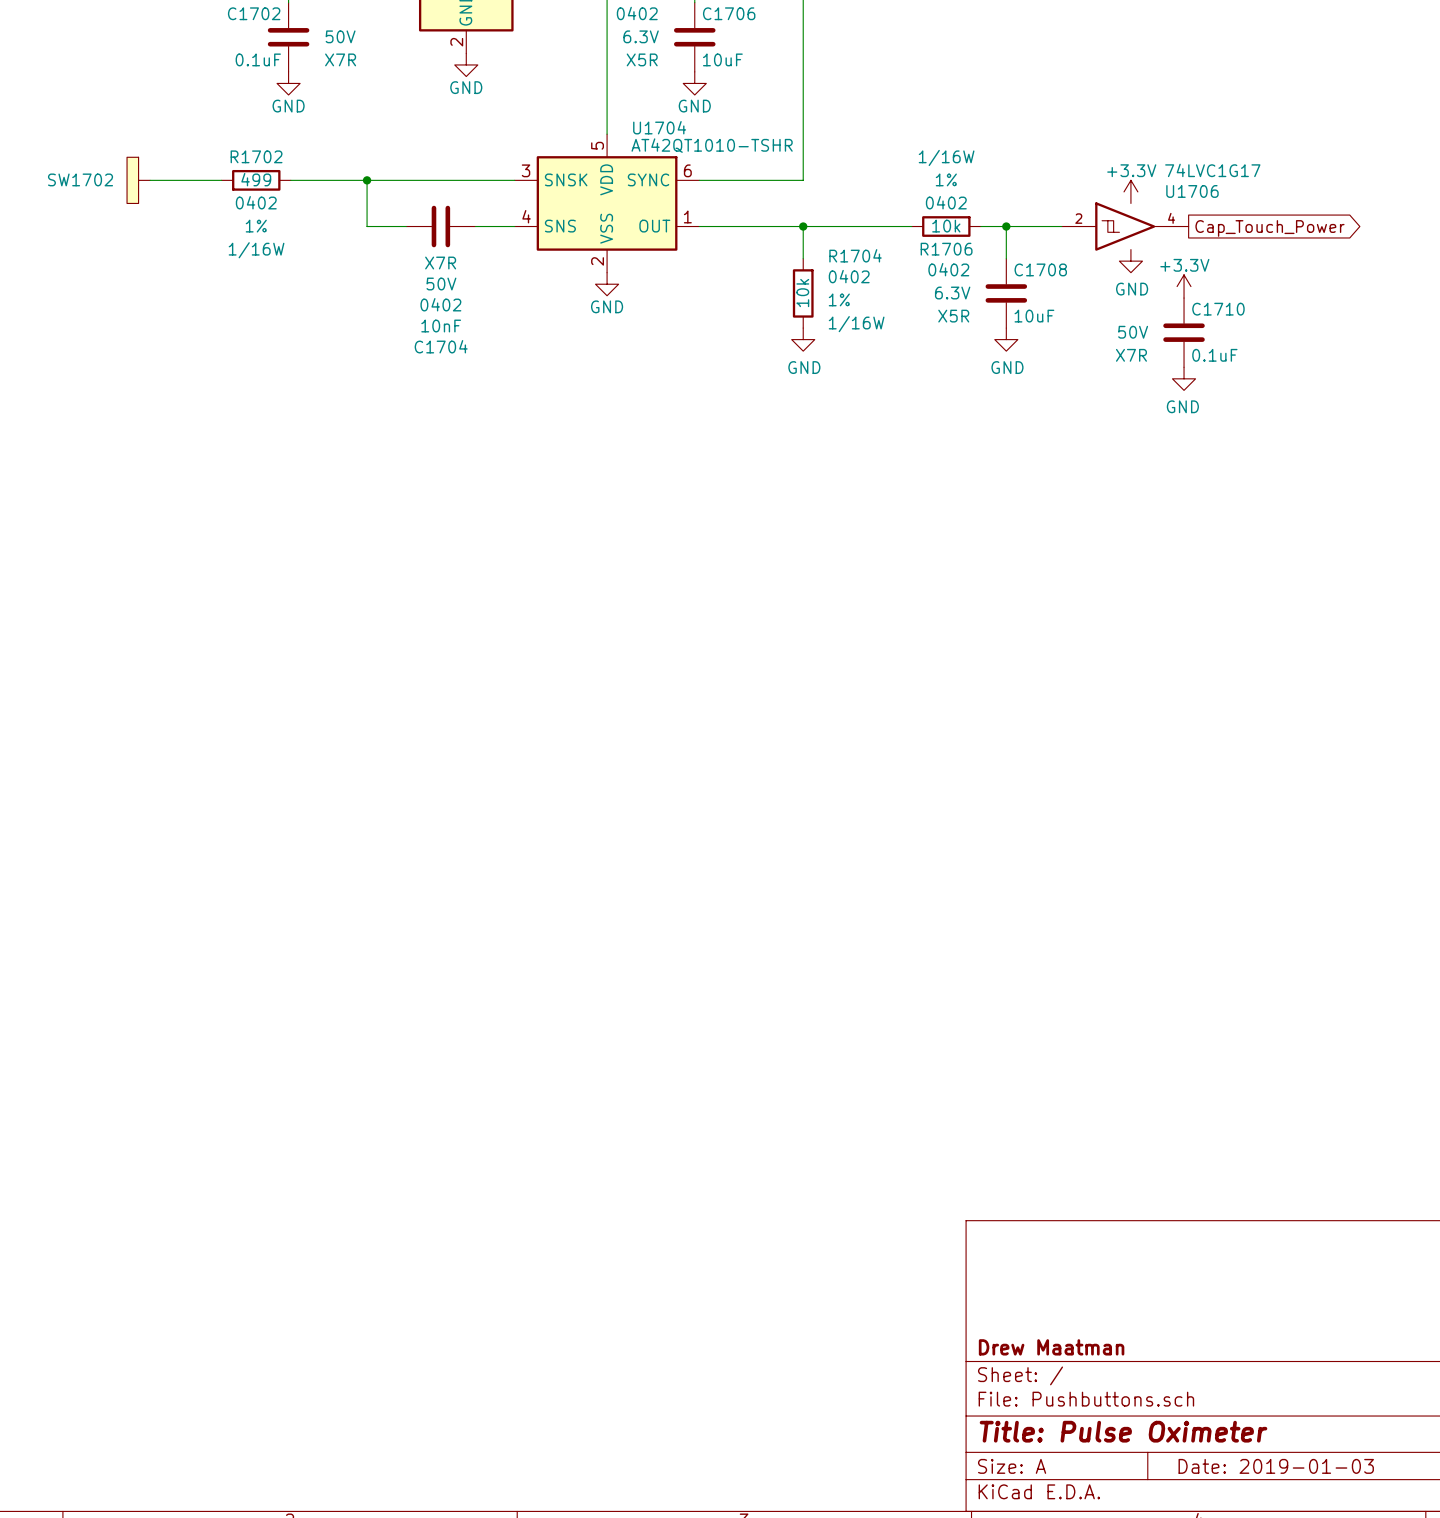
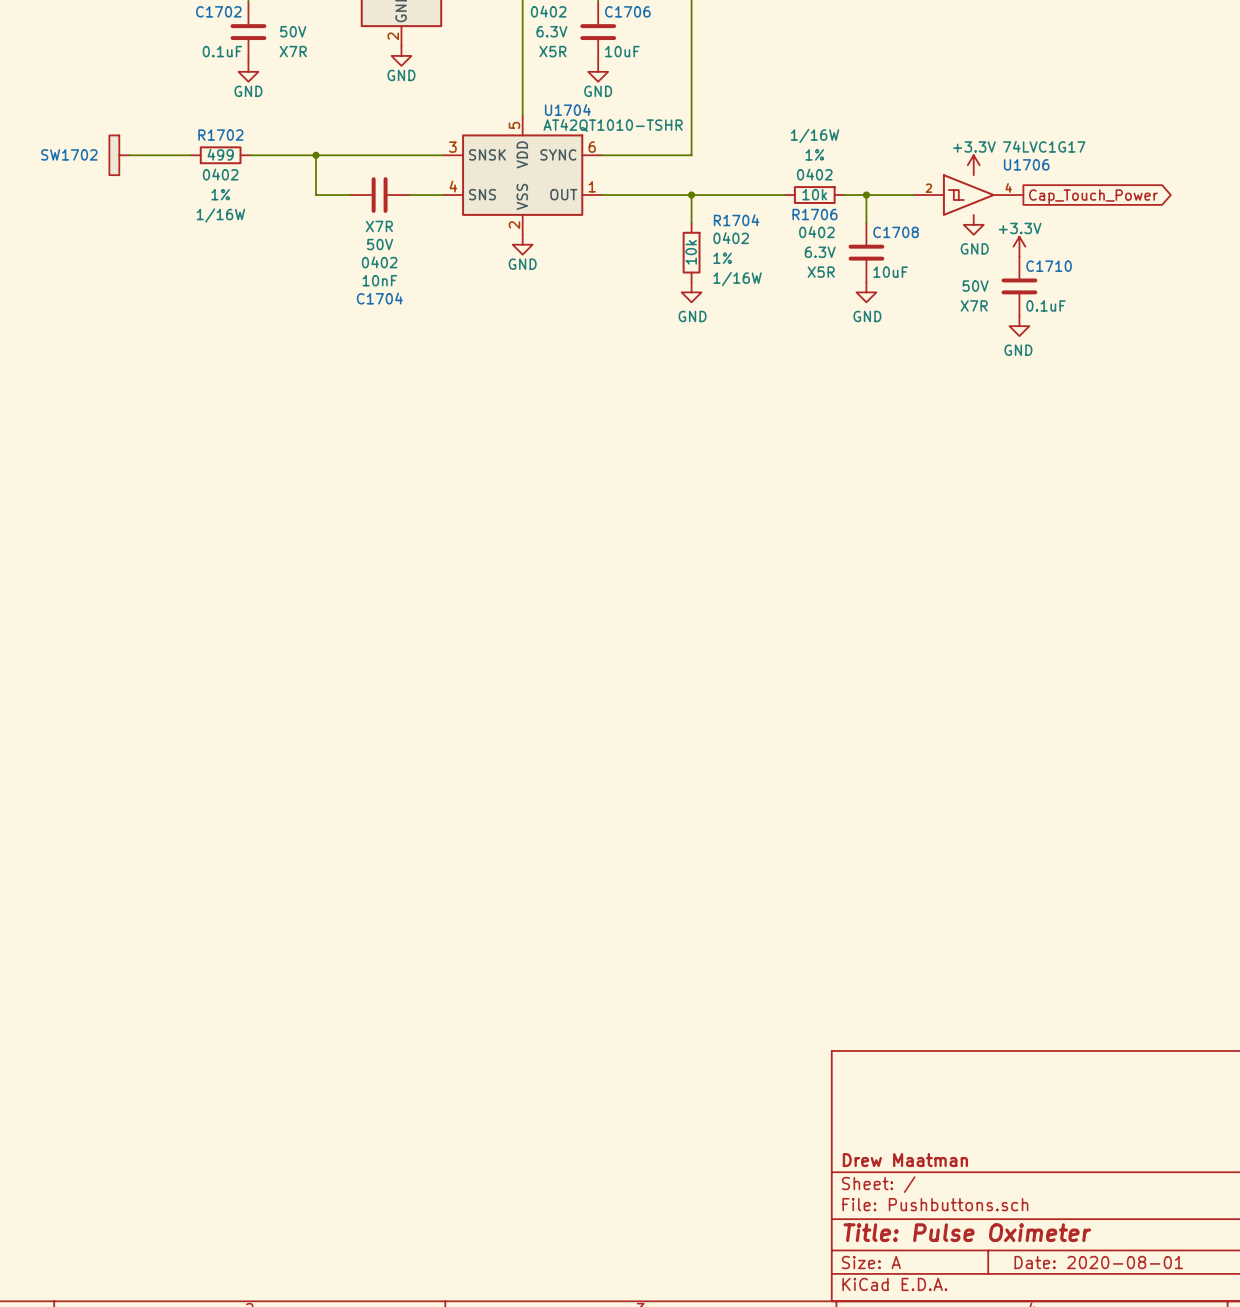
title block: Date: 2019-01-03 (1276, 1466) -> Date: 2020-08-01 (1098, 1262)

